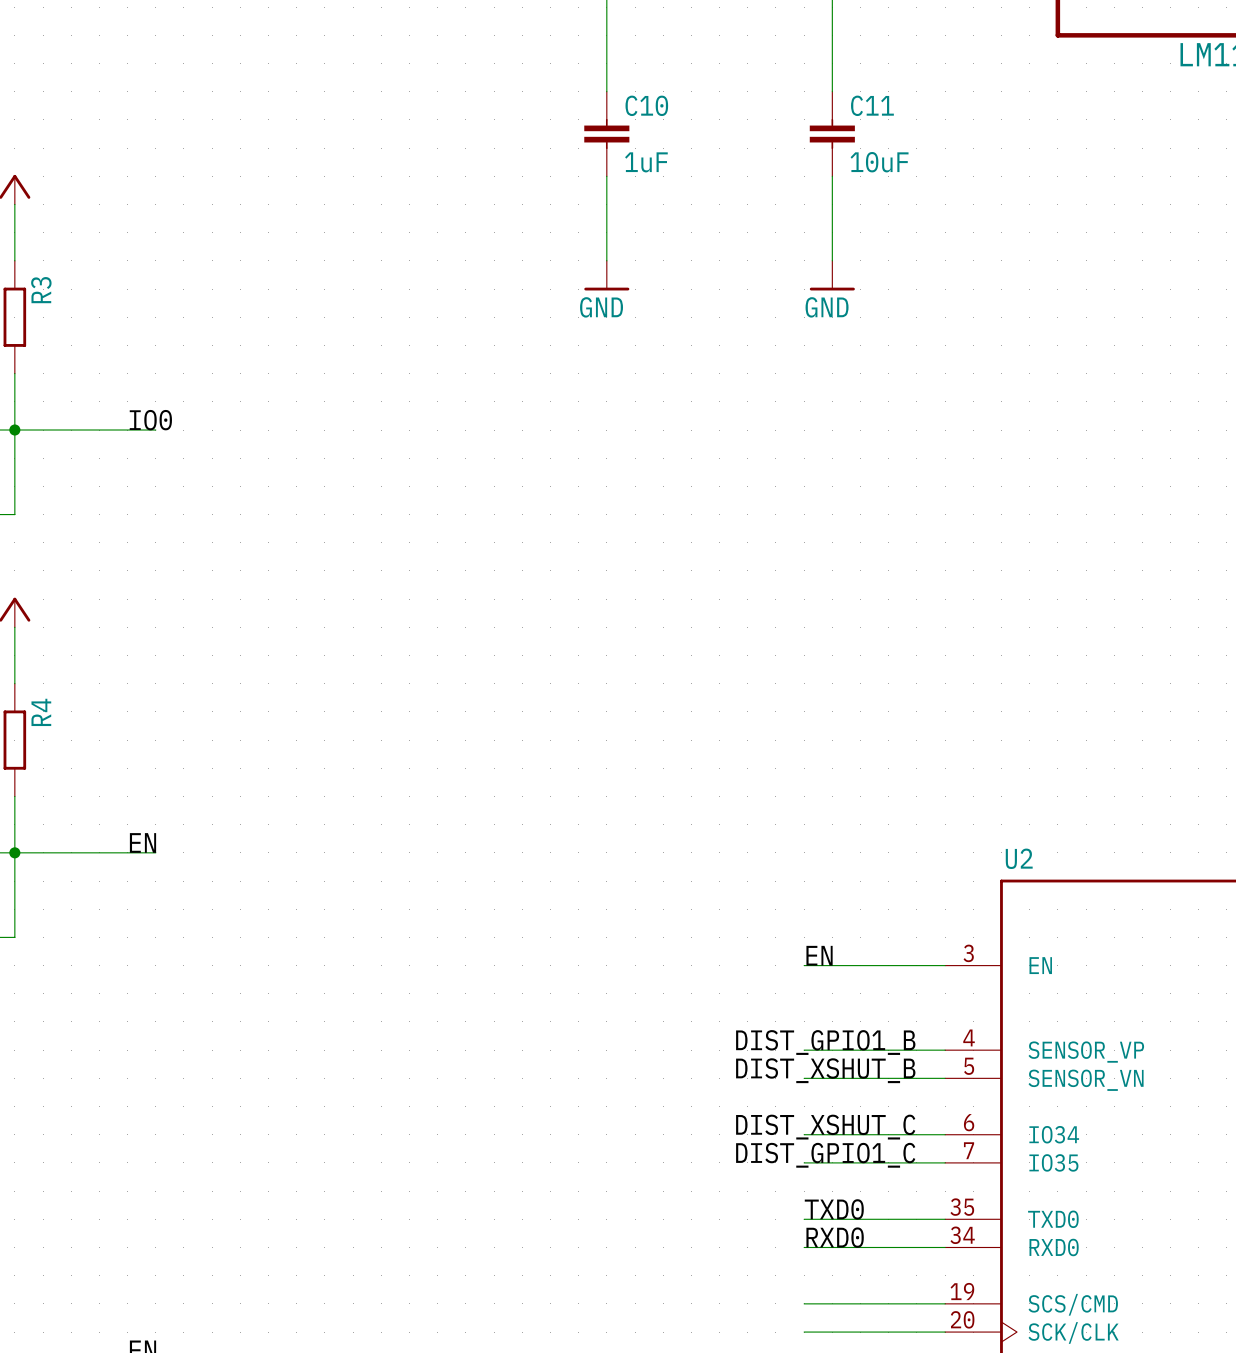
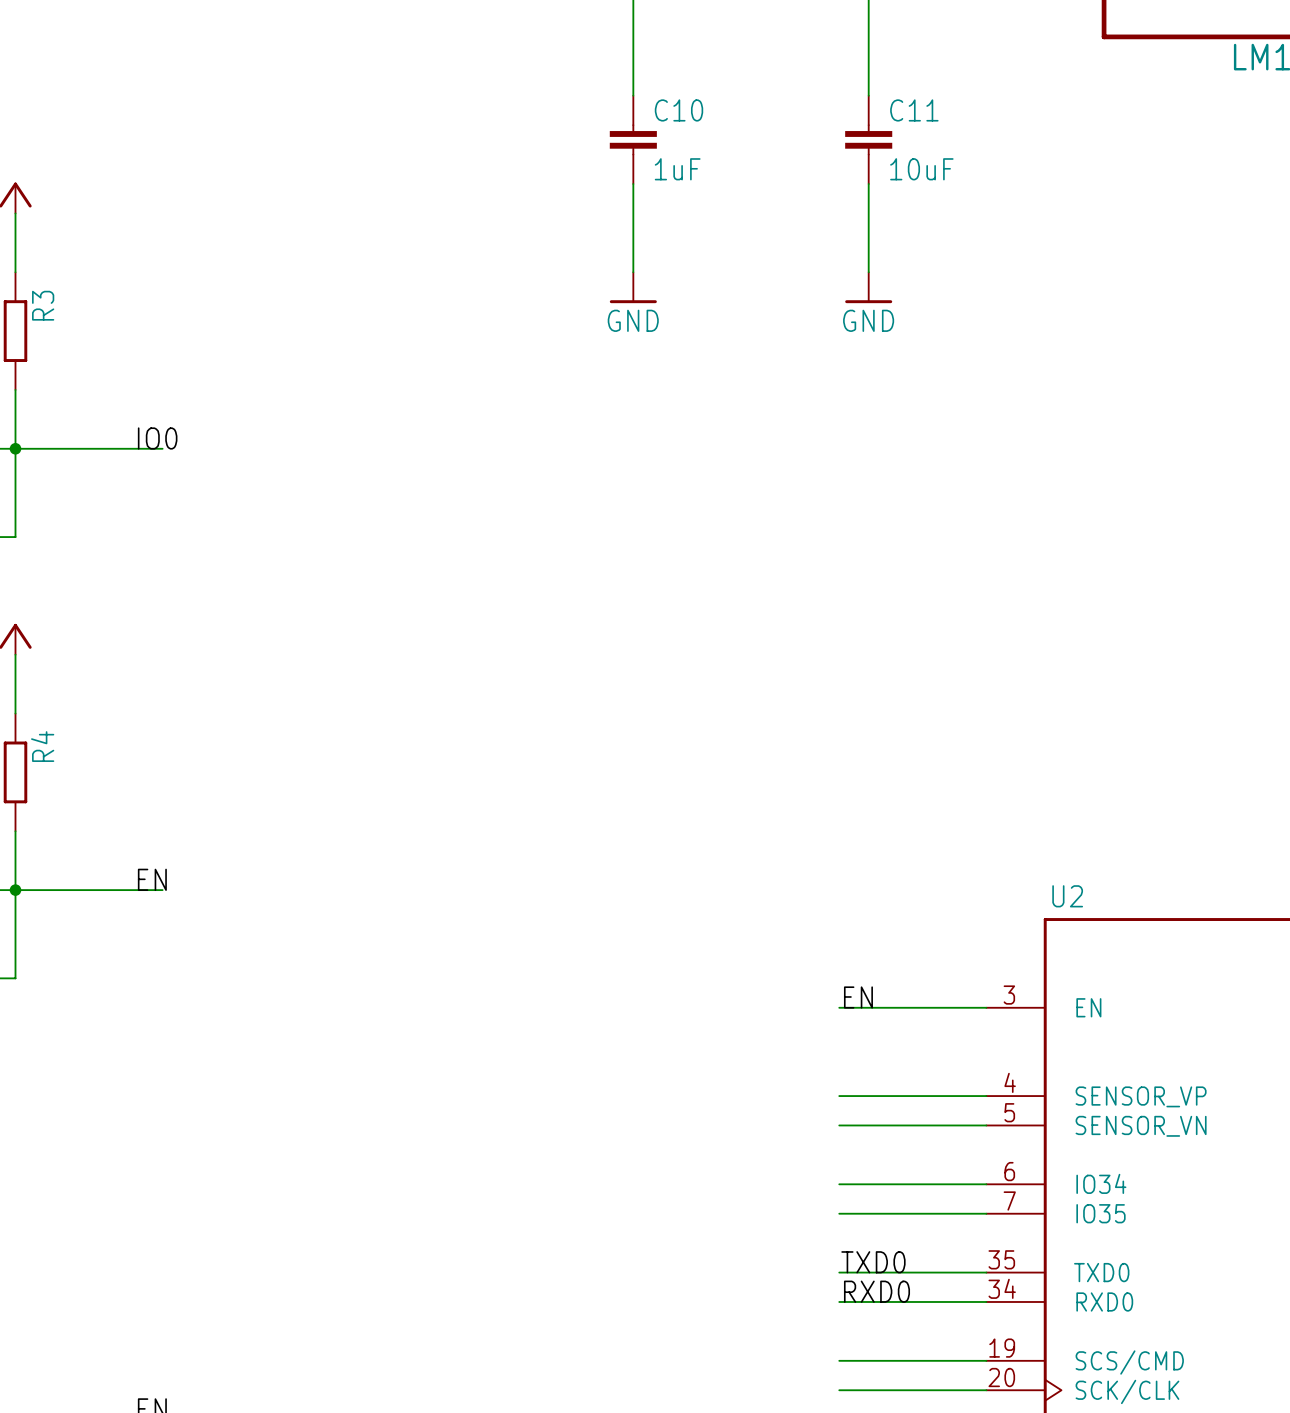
label: DIST_GPIO1_B (825, 1042) -> none
label: DIST_XSHUT_B (825, 1070) -> none
label: DIST_XSHUT_C (825, 1127) -> none
label: DIST_GPIO1_C (825, 1155) -> none

